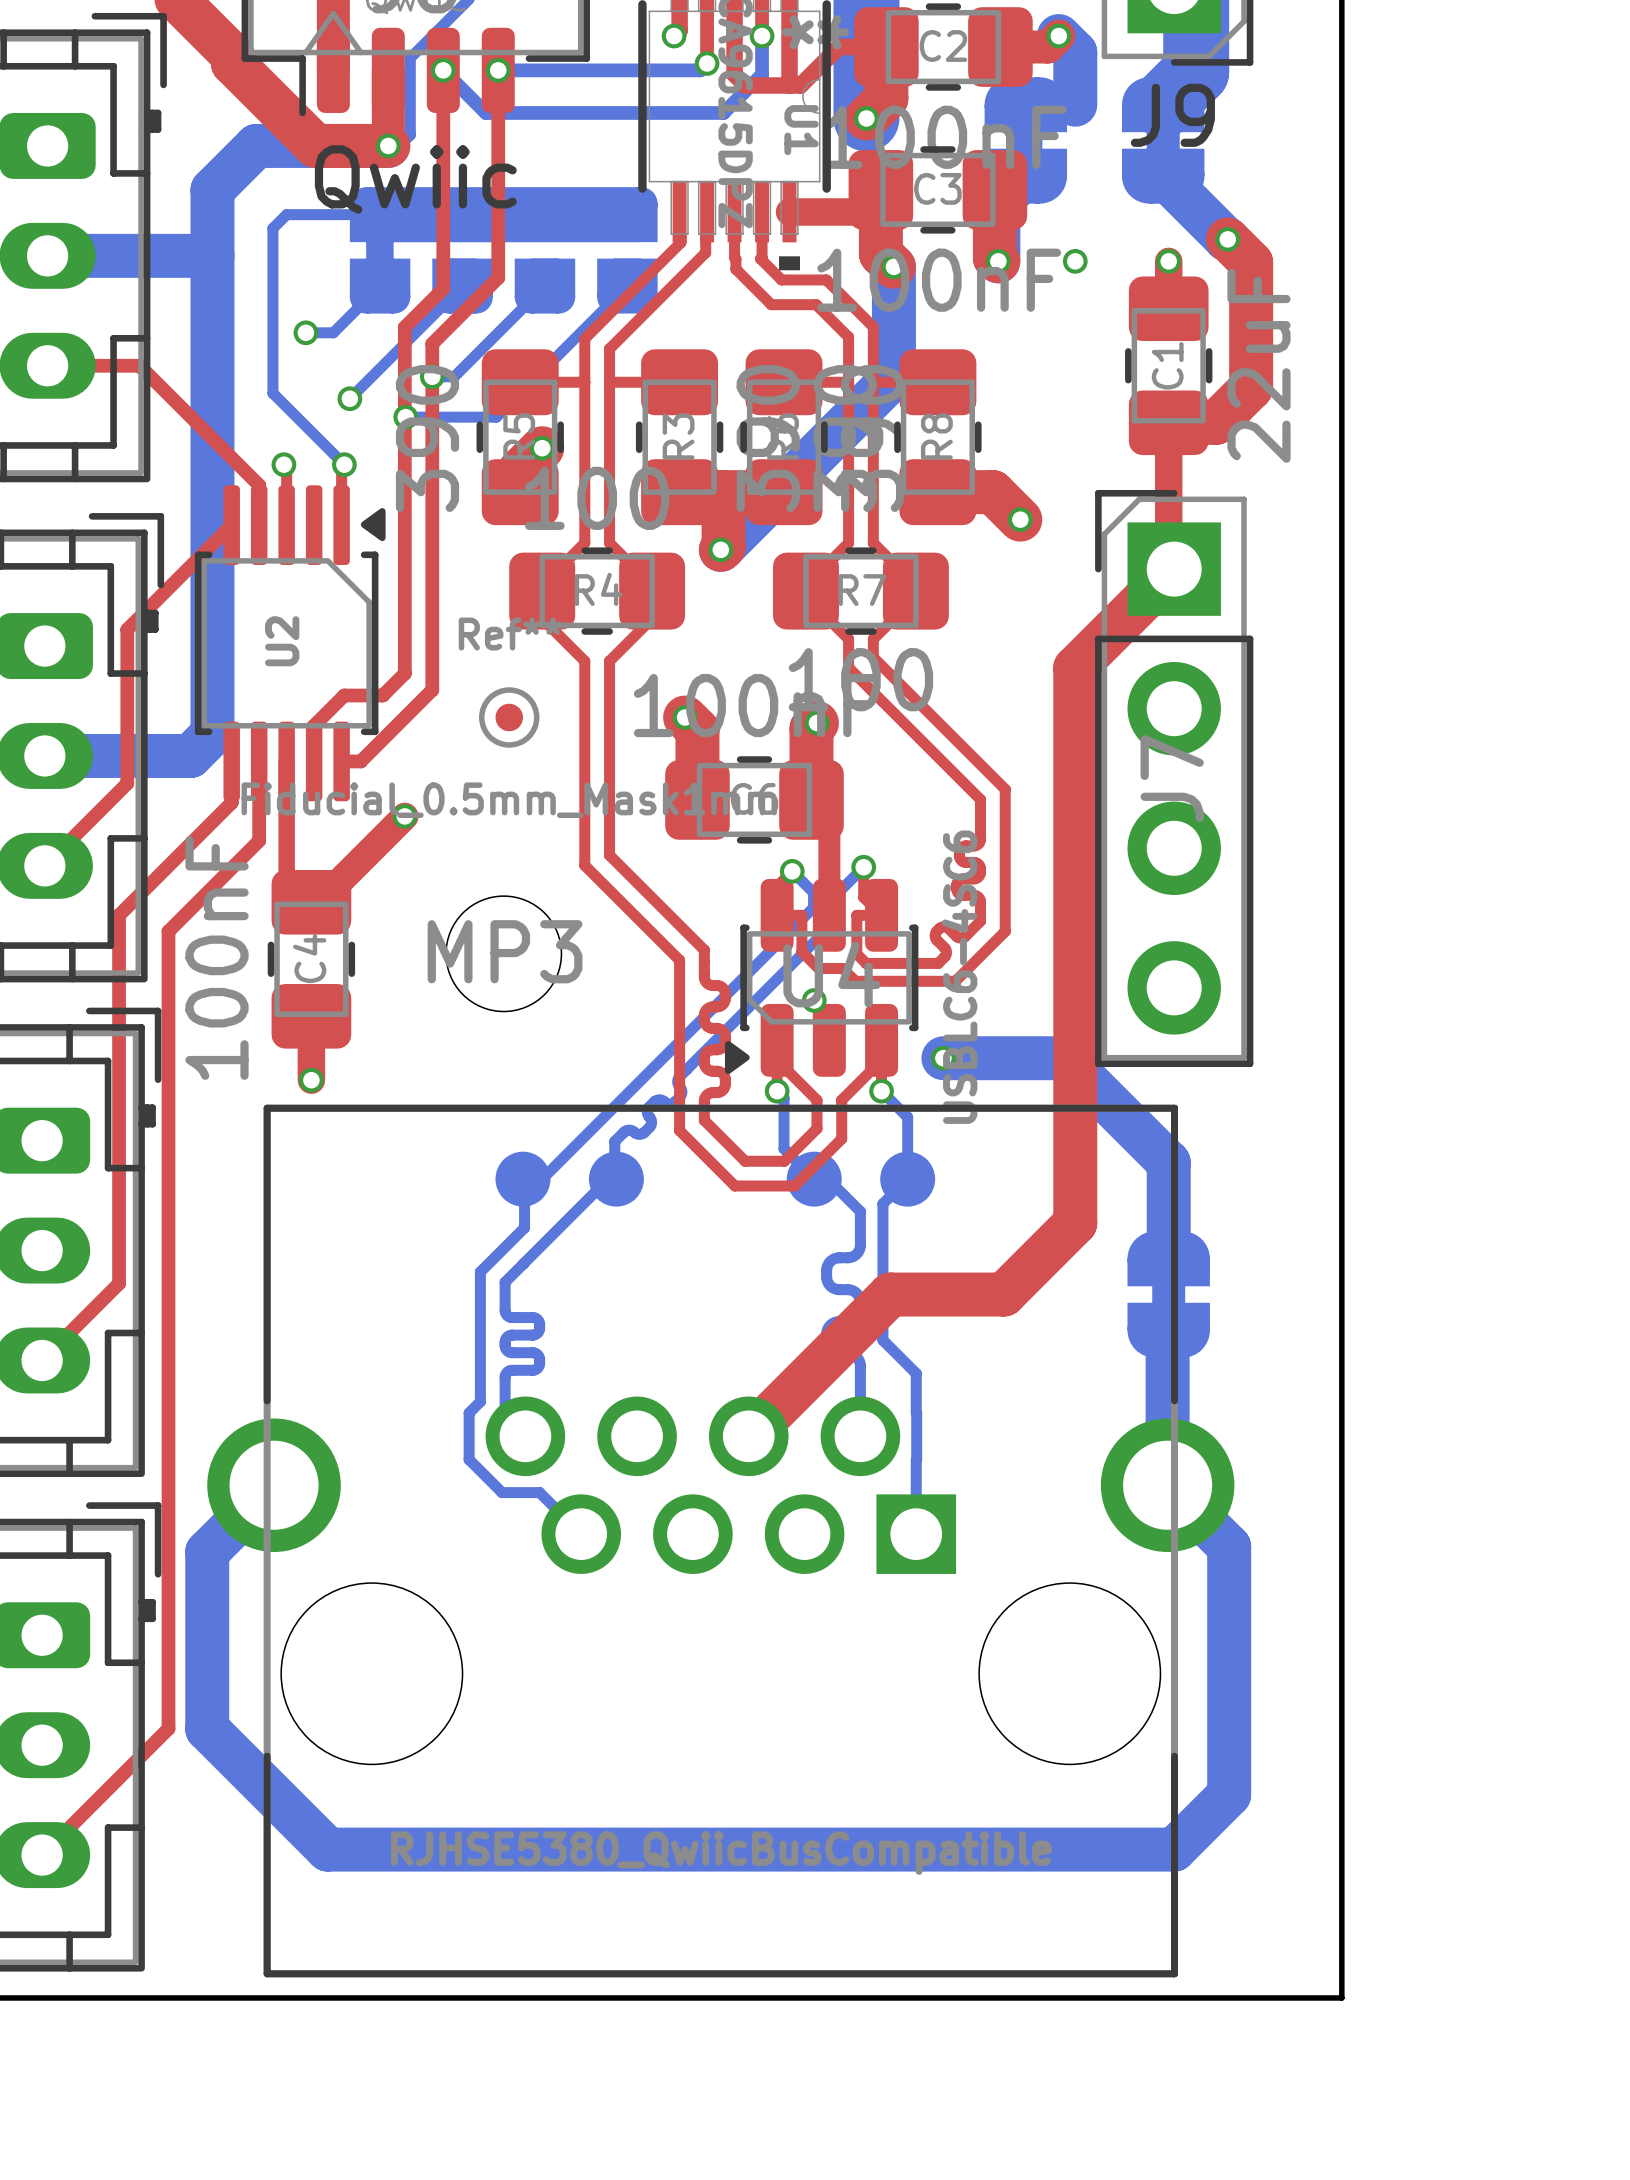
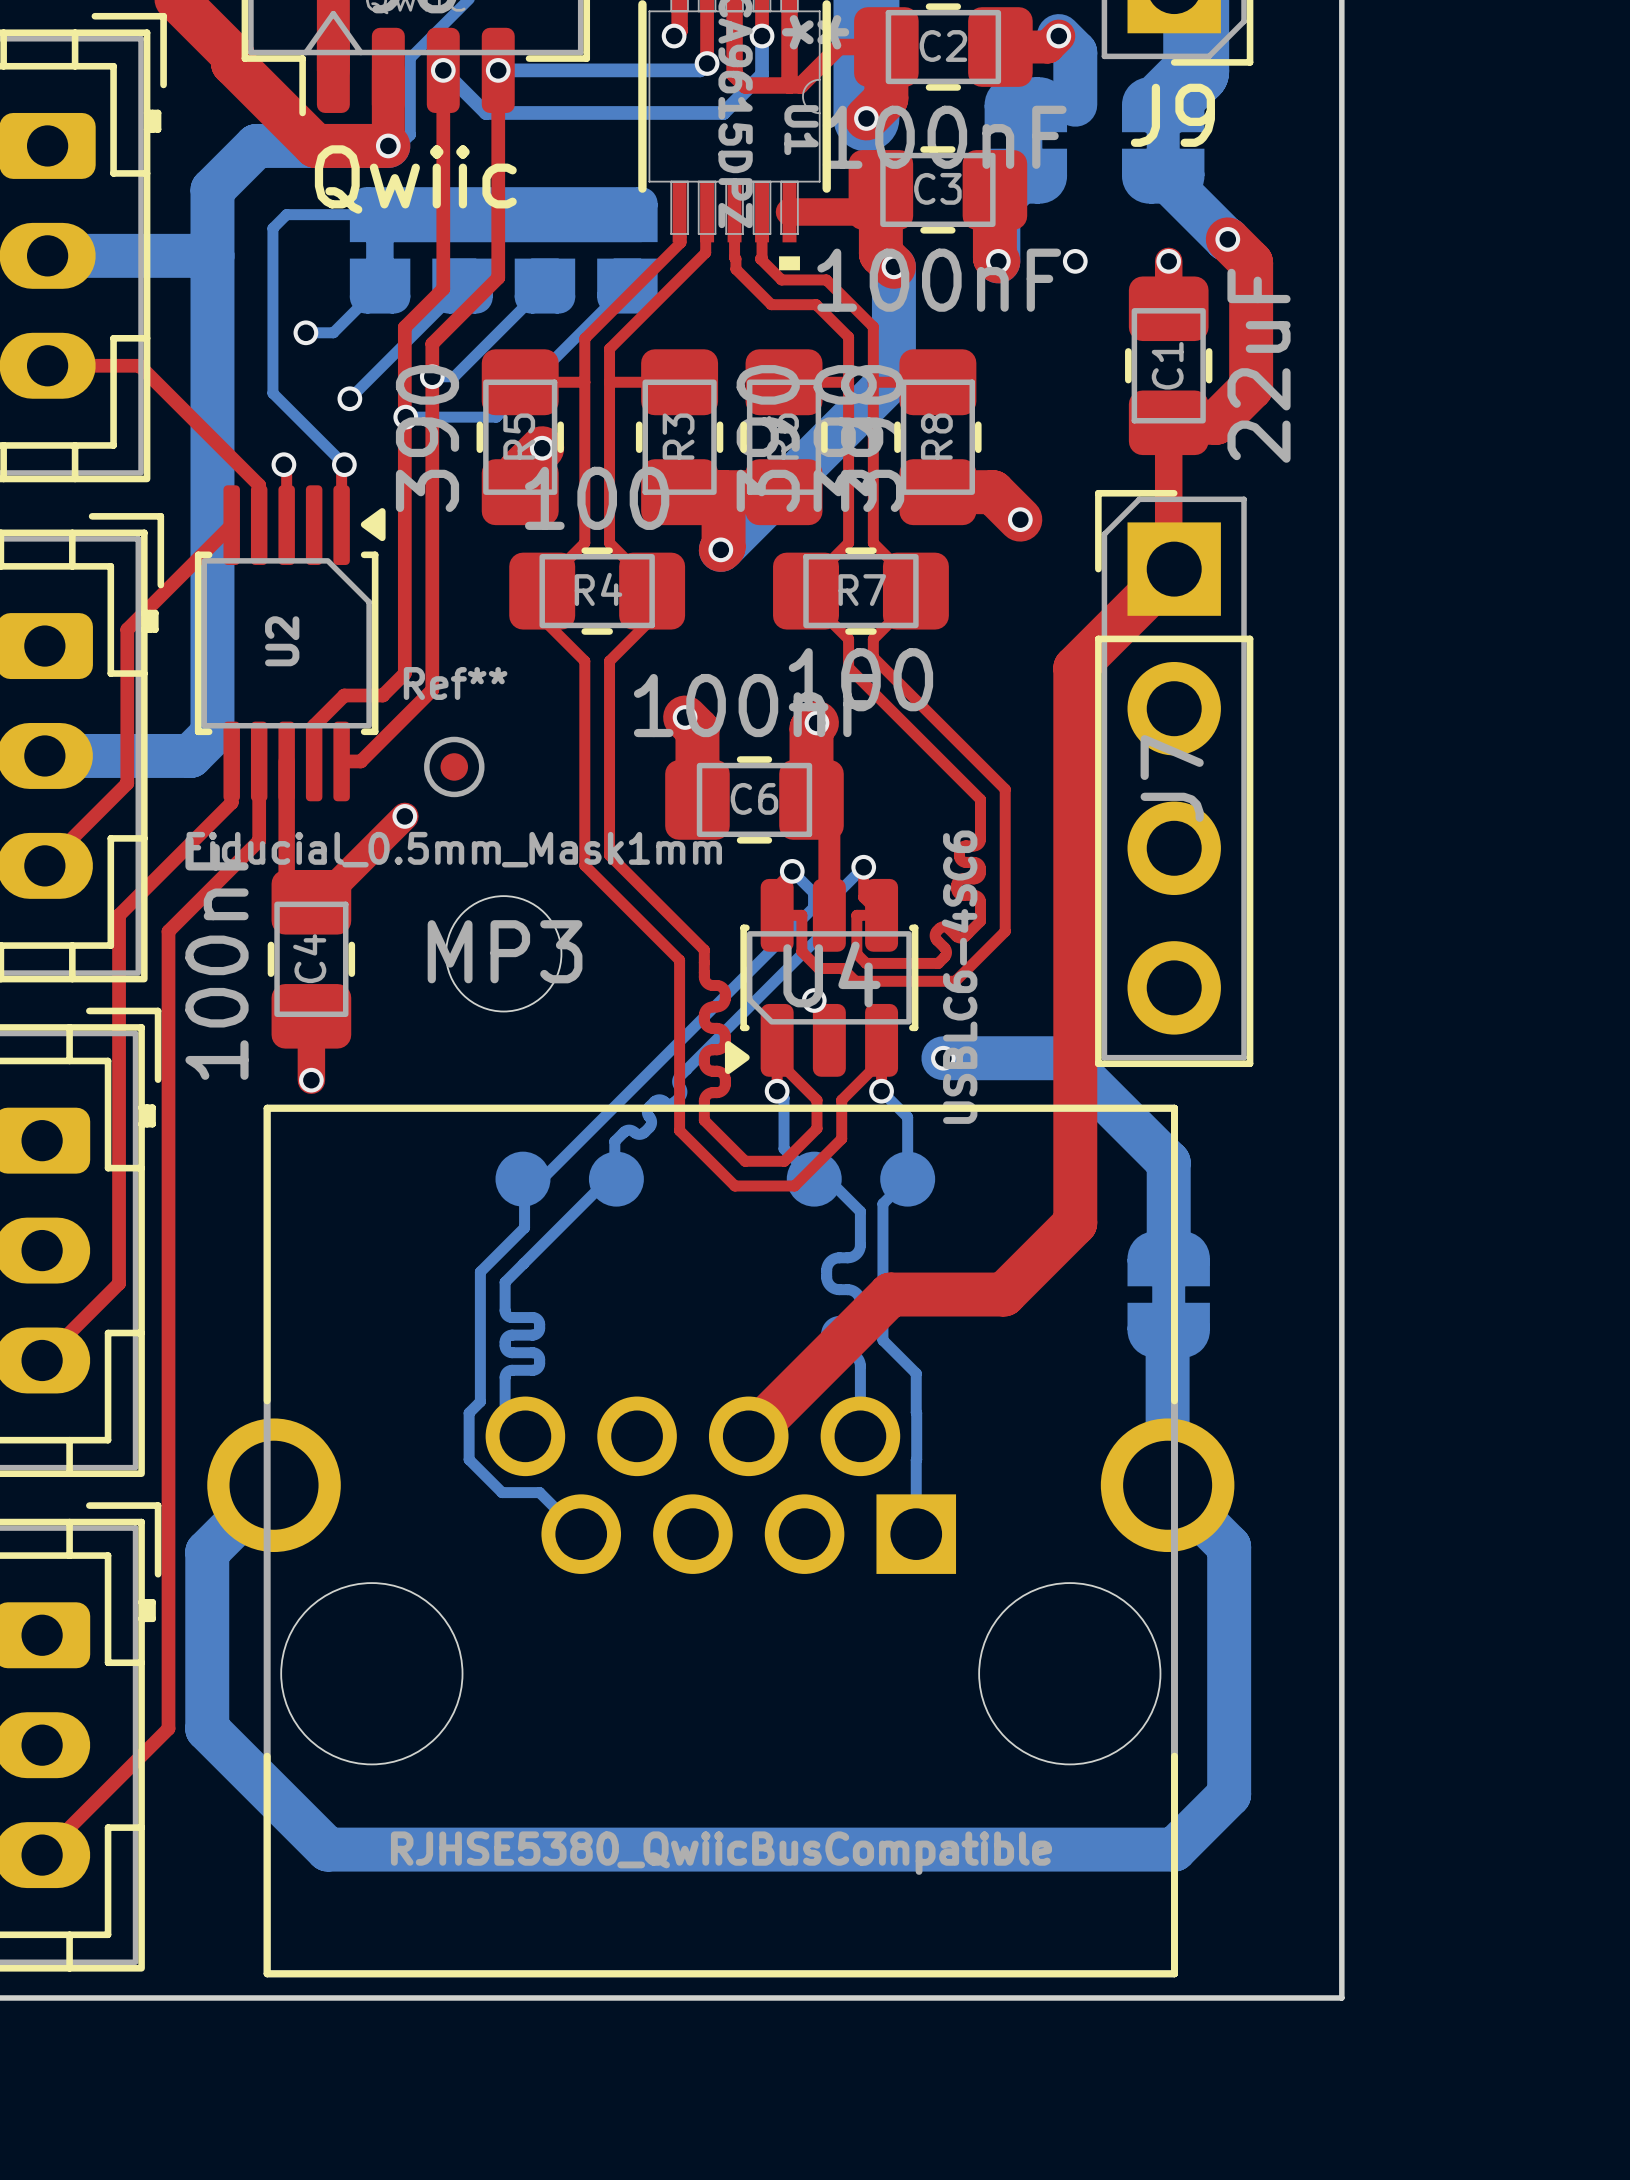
Ref** position: (509, 717) -> (454, 766)

